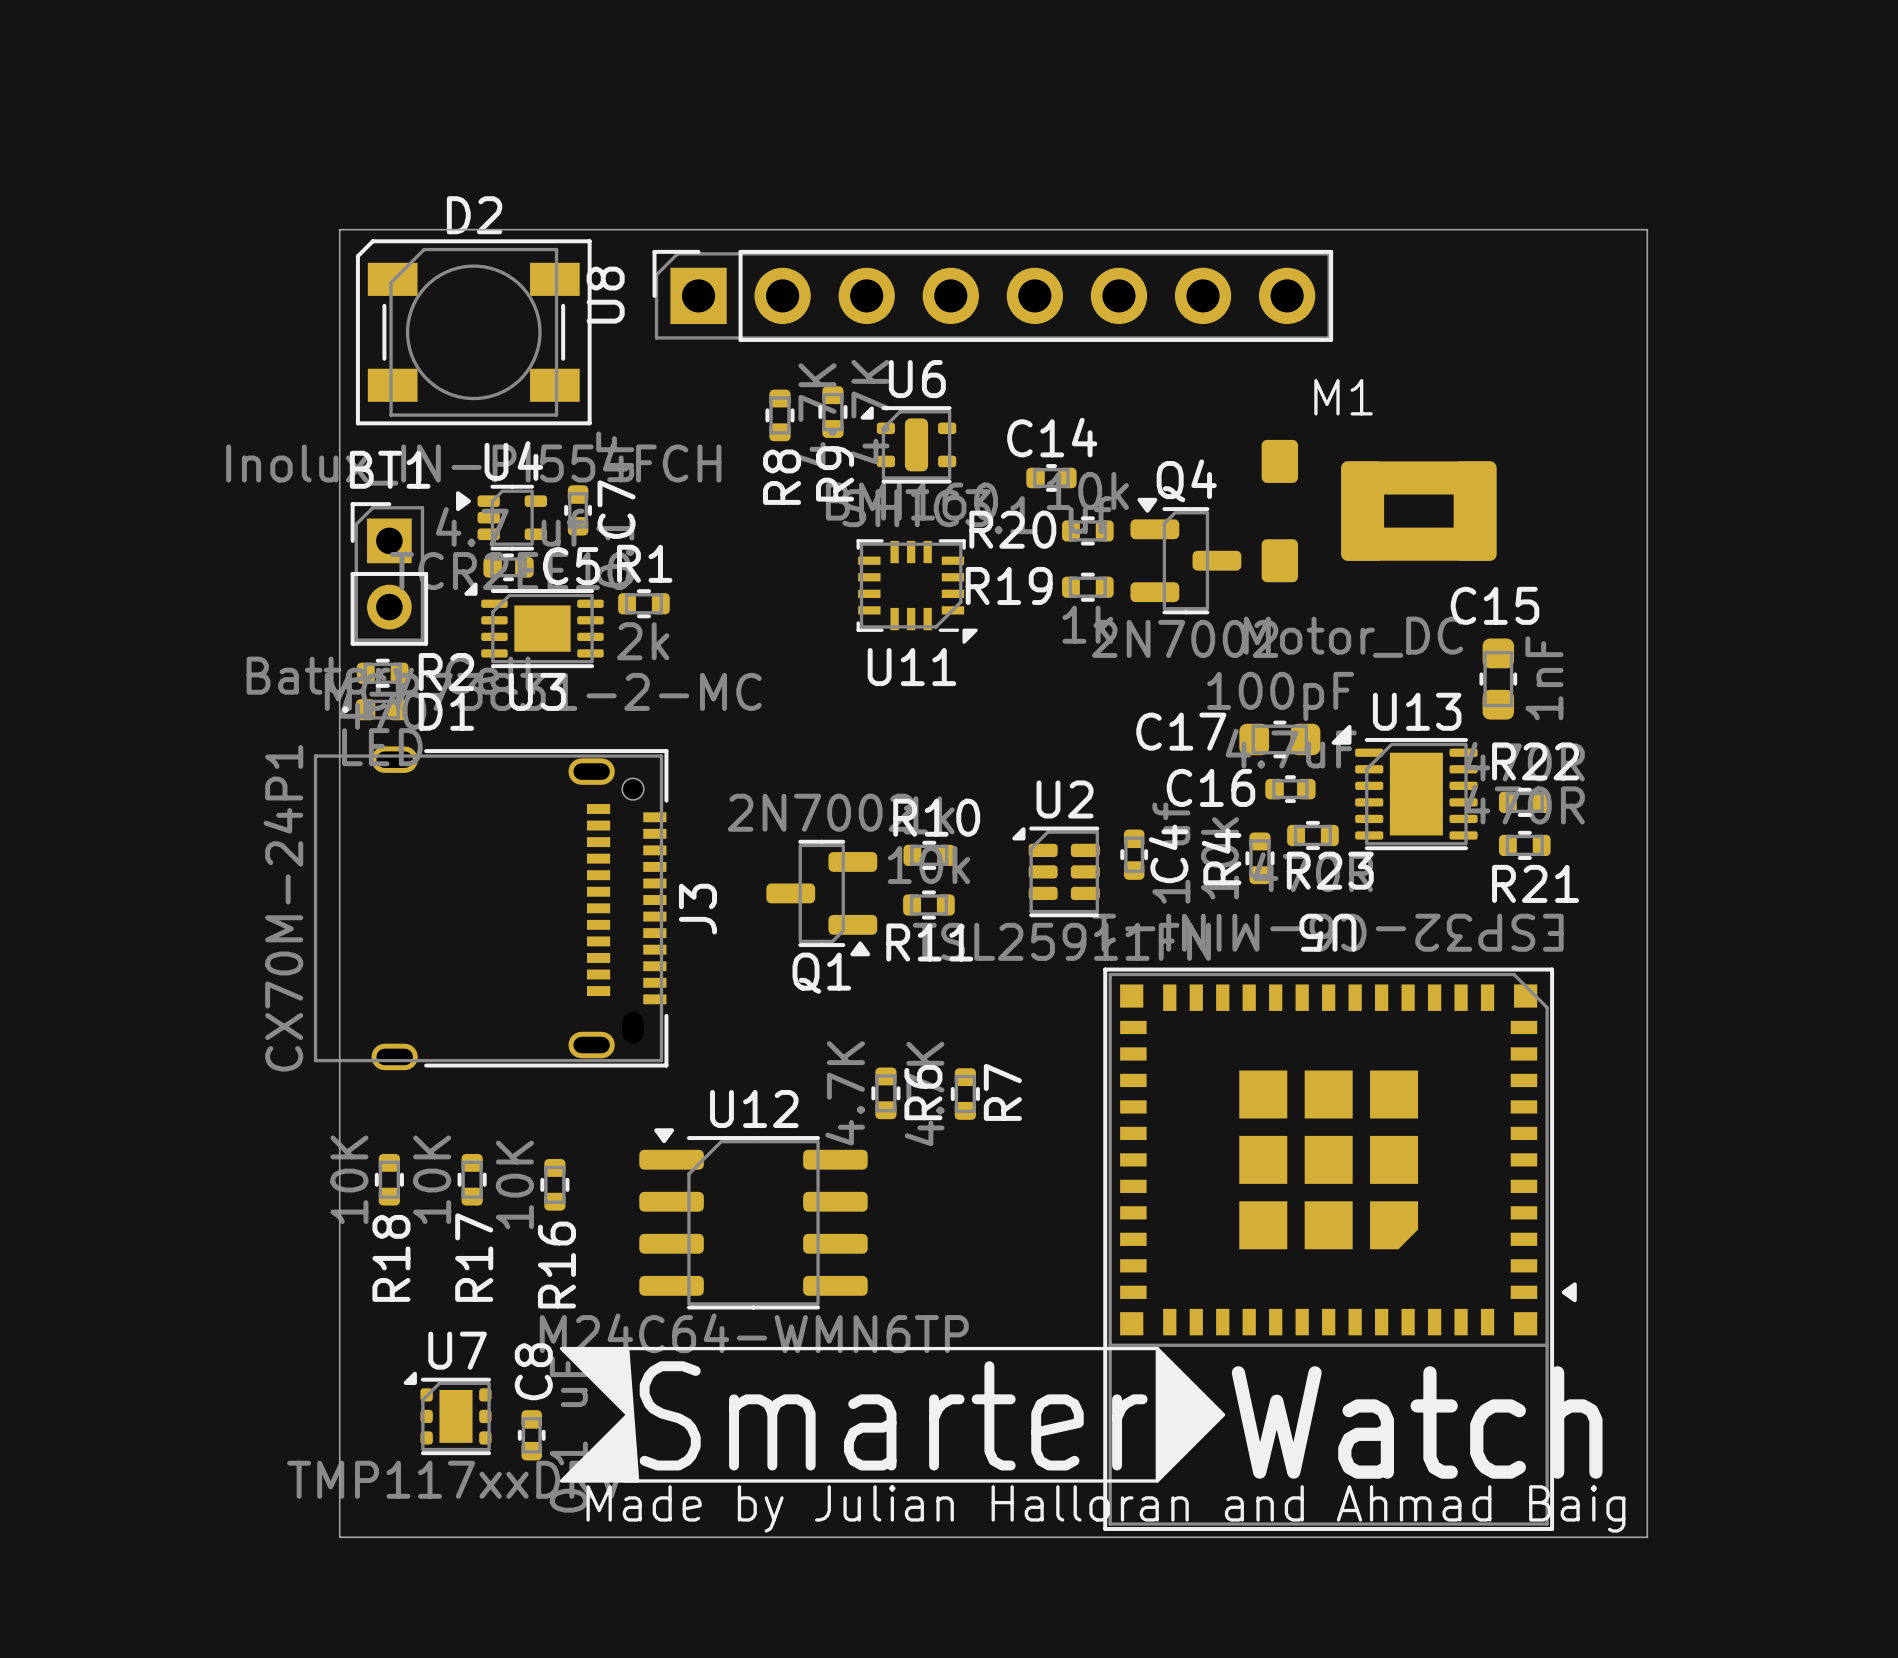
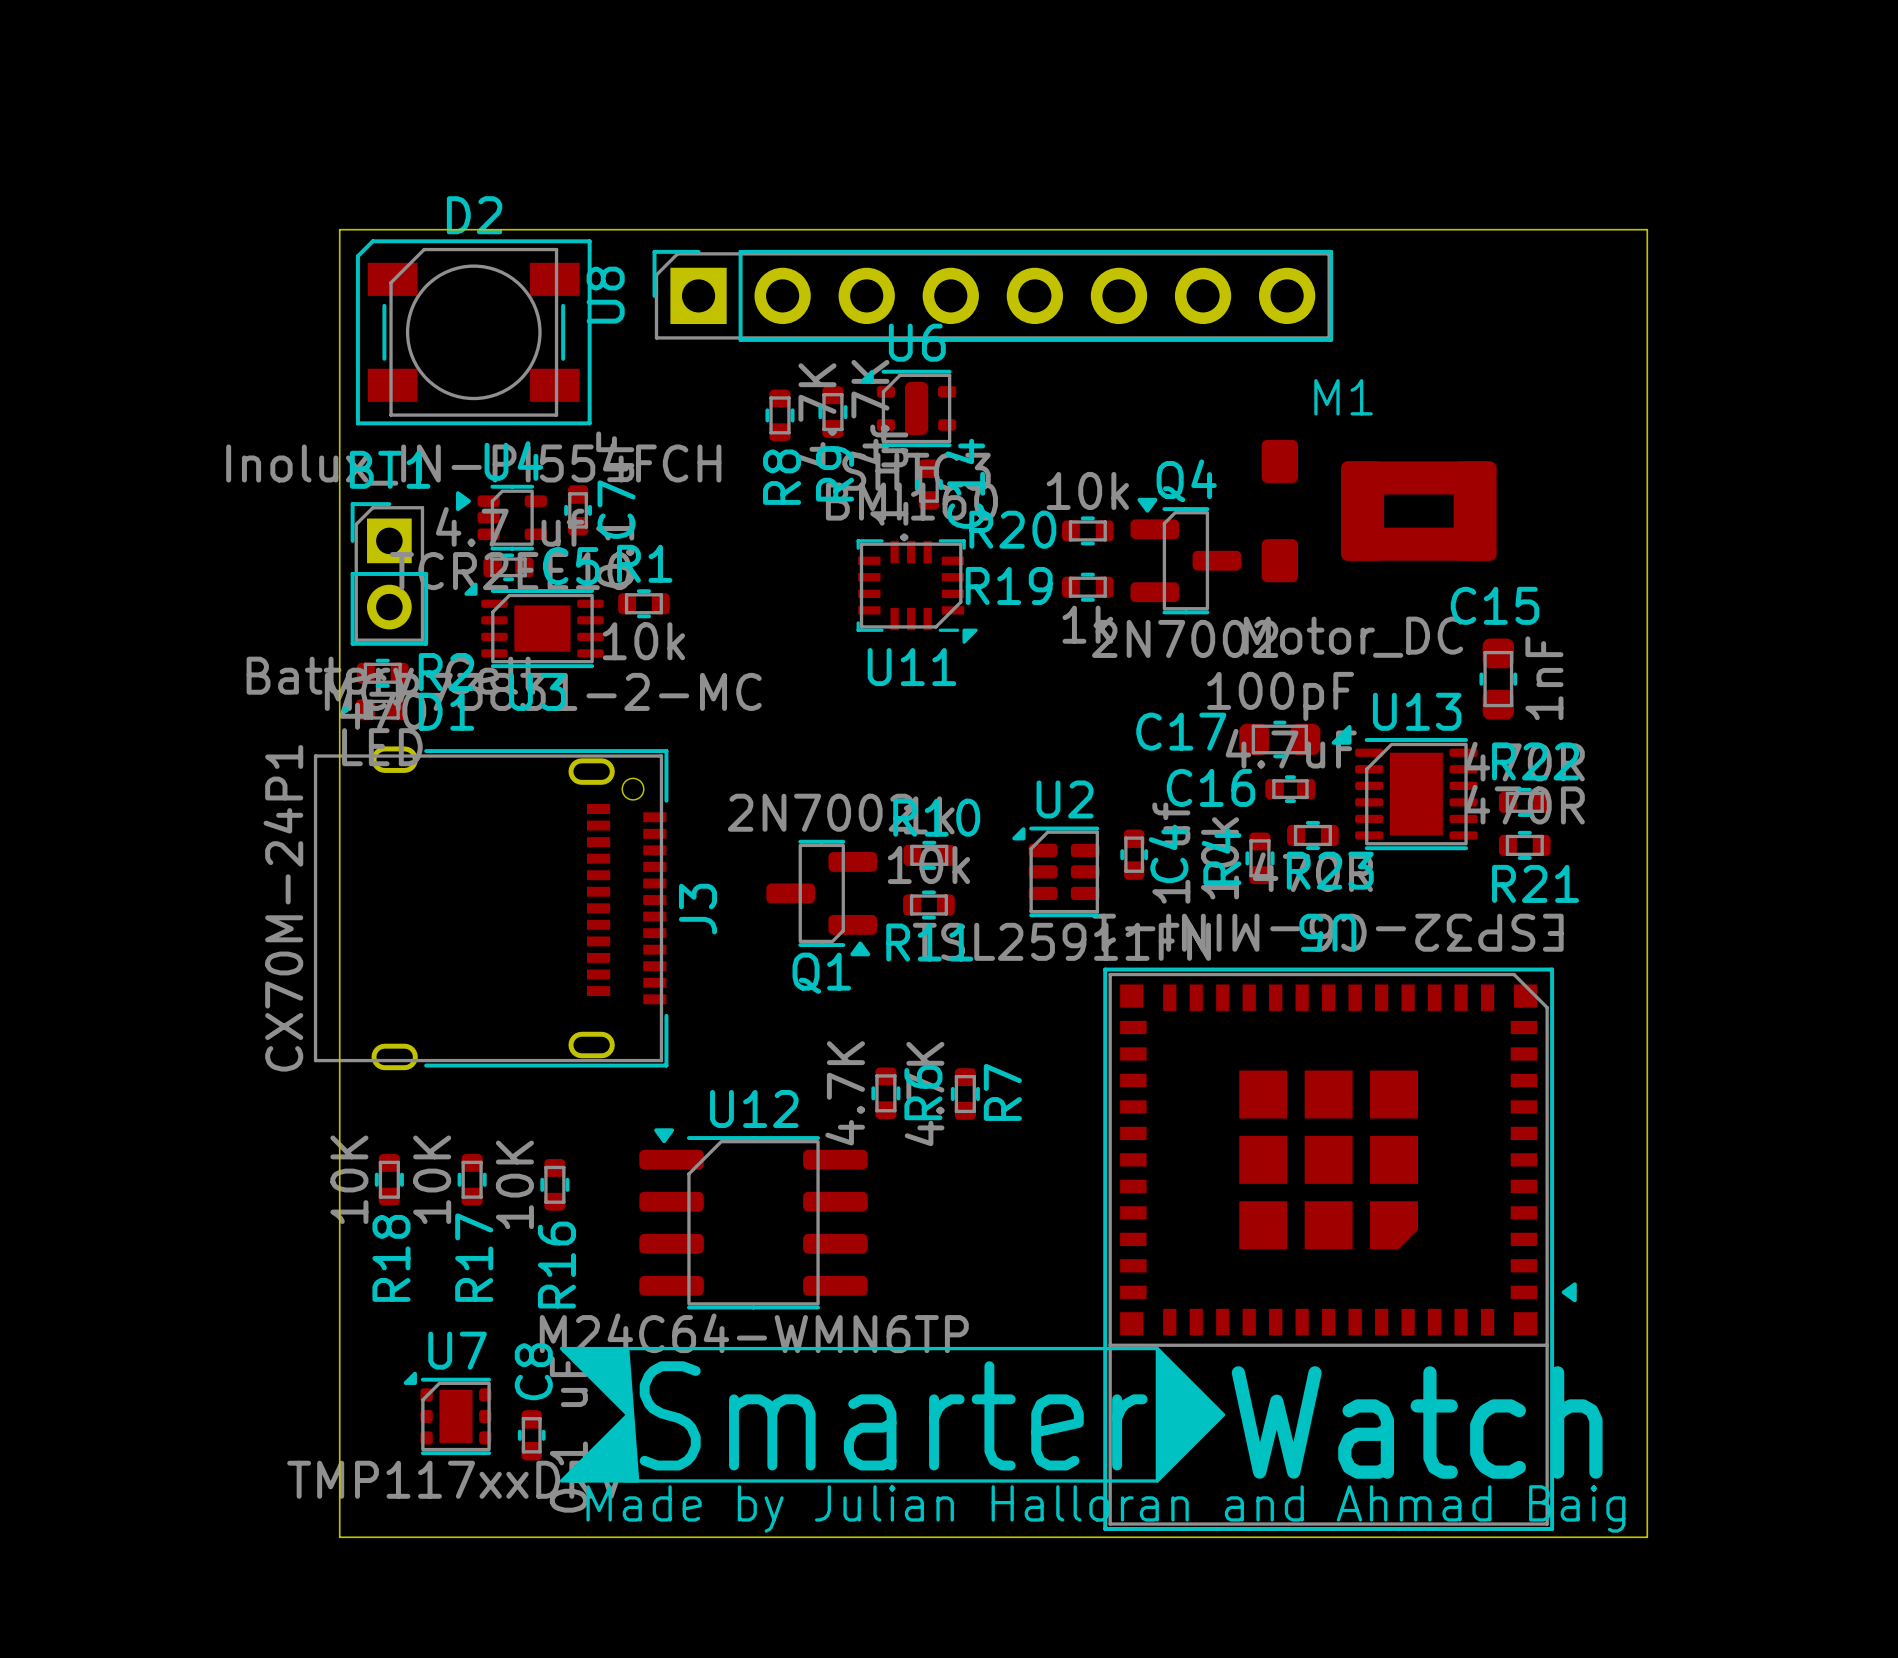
U6 position: (908, 444) -> (908, 408)
C14 rotation: 0° (1051, 477) -> 90° clockwise (928, 484)
C14 position: (1051, 477) -> (928, 484)
R1 value: 2k (643, 641) -> 10k (643, 641)

